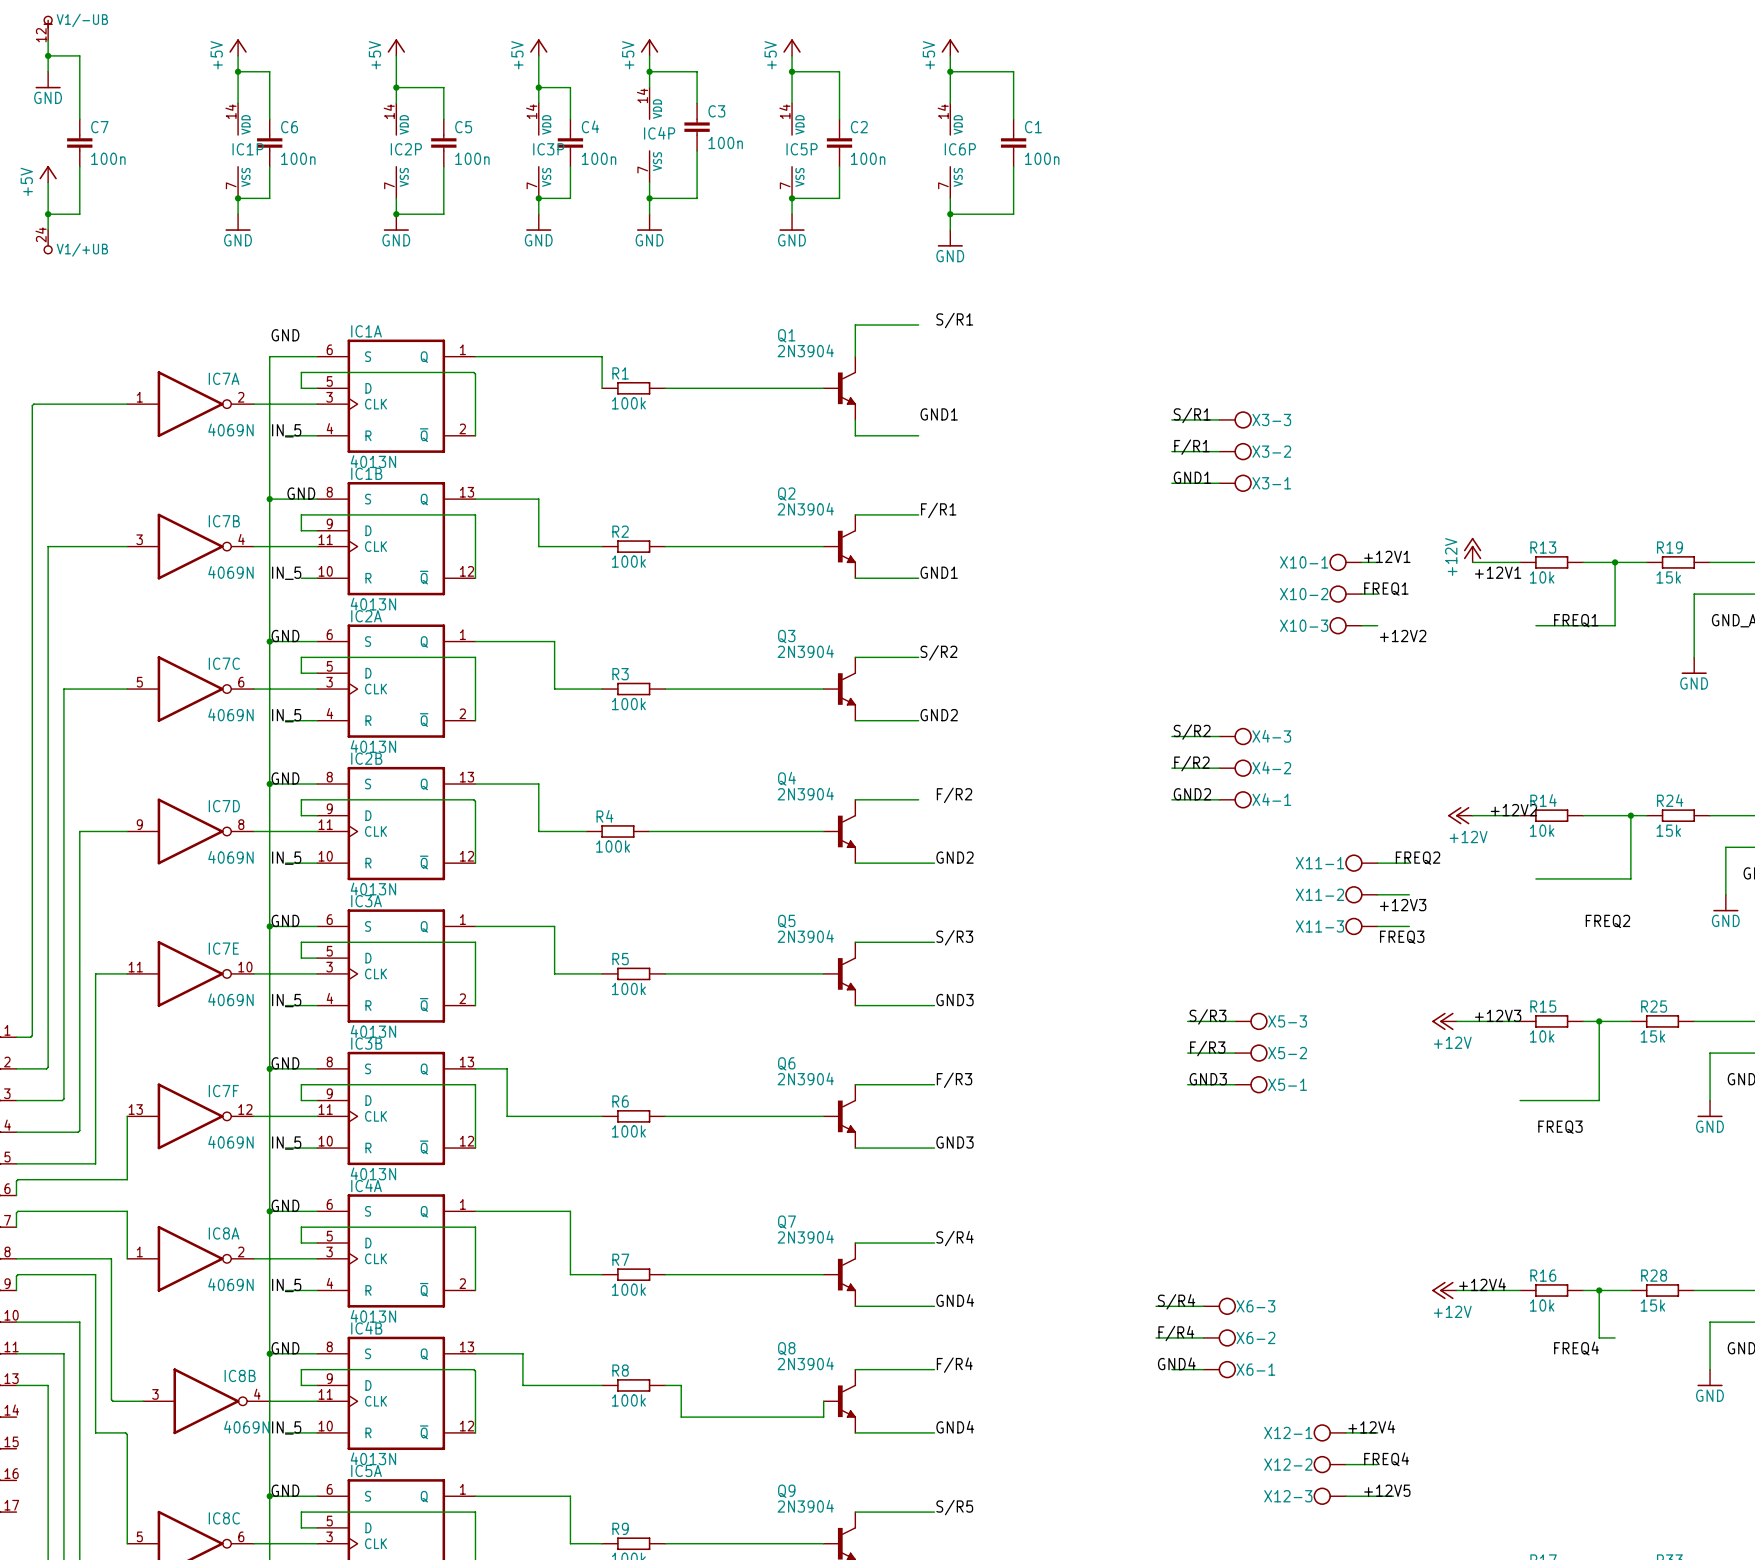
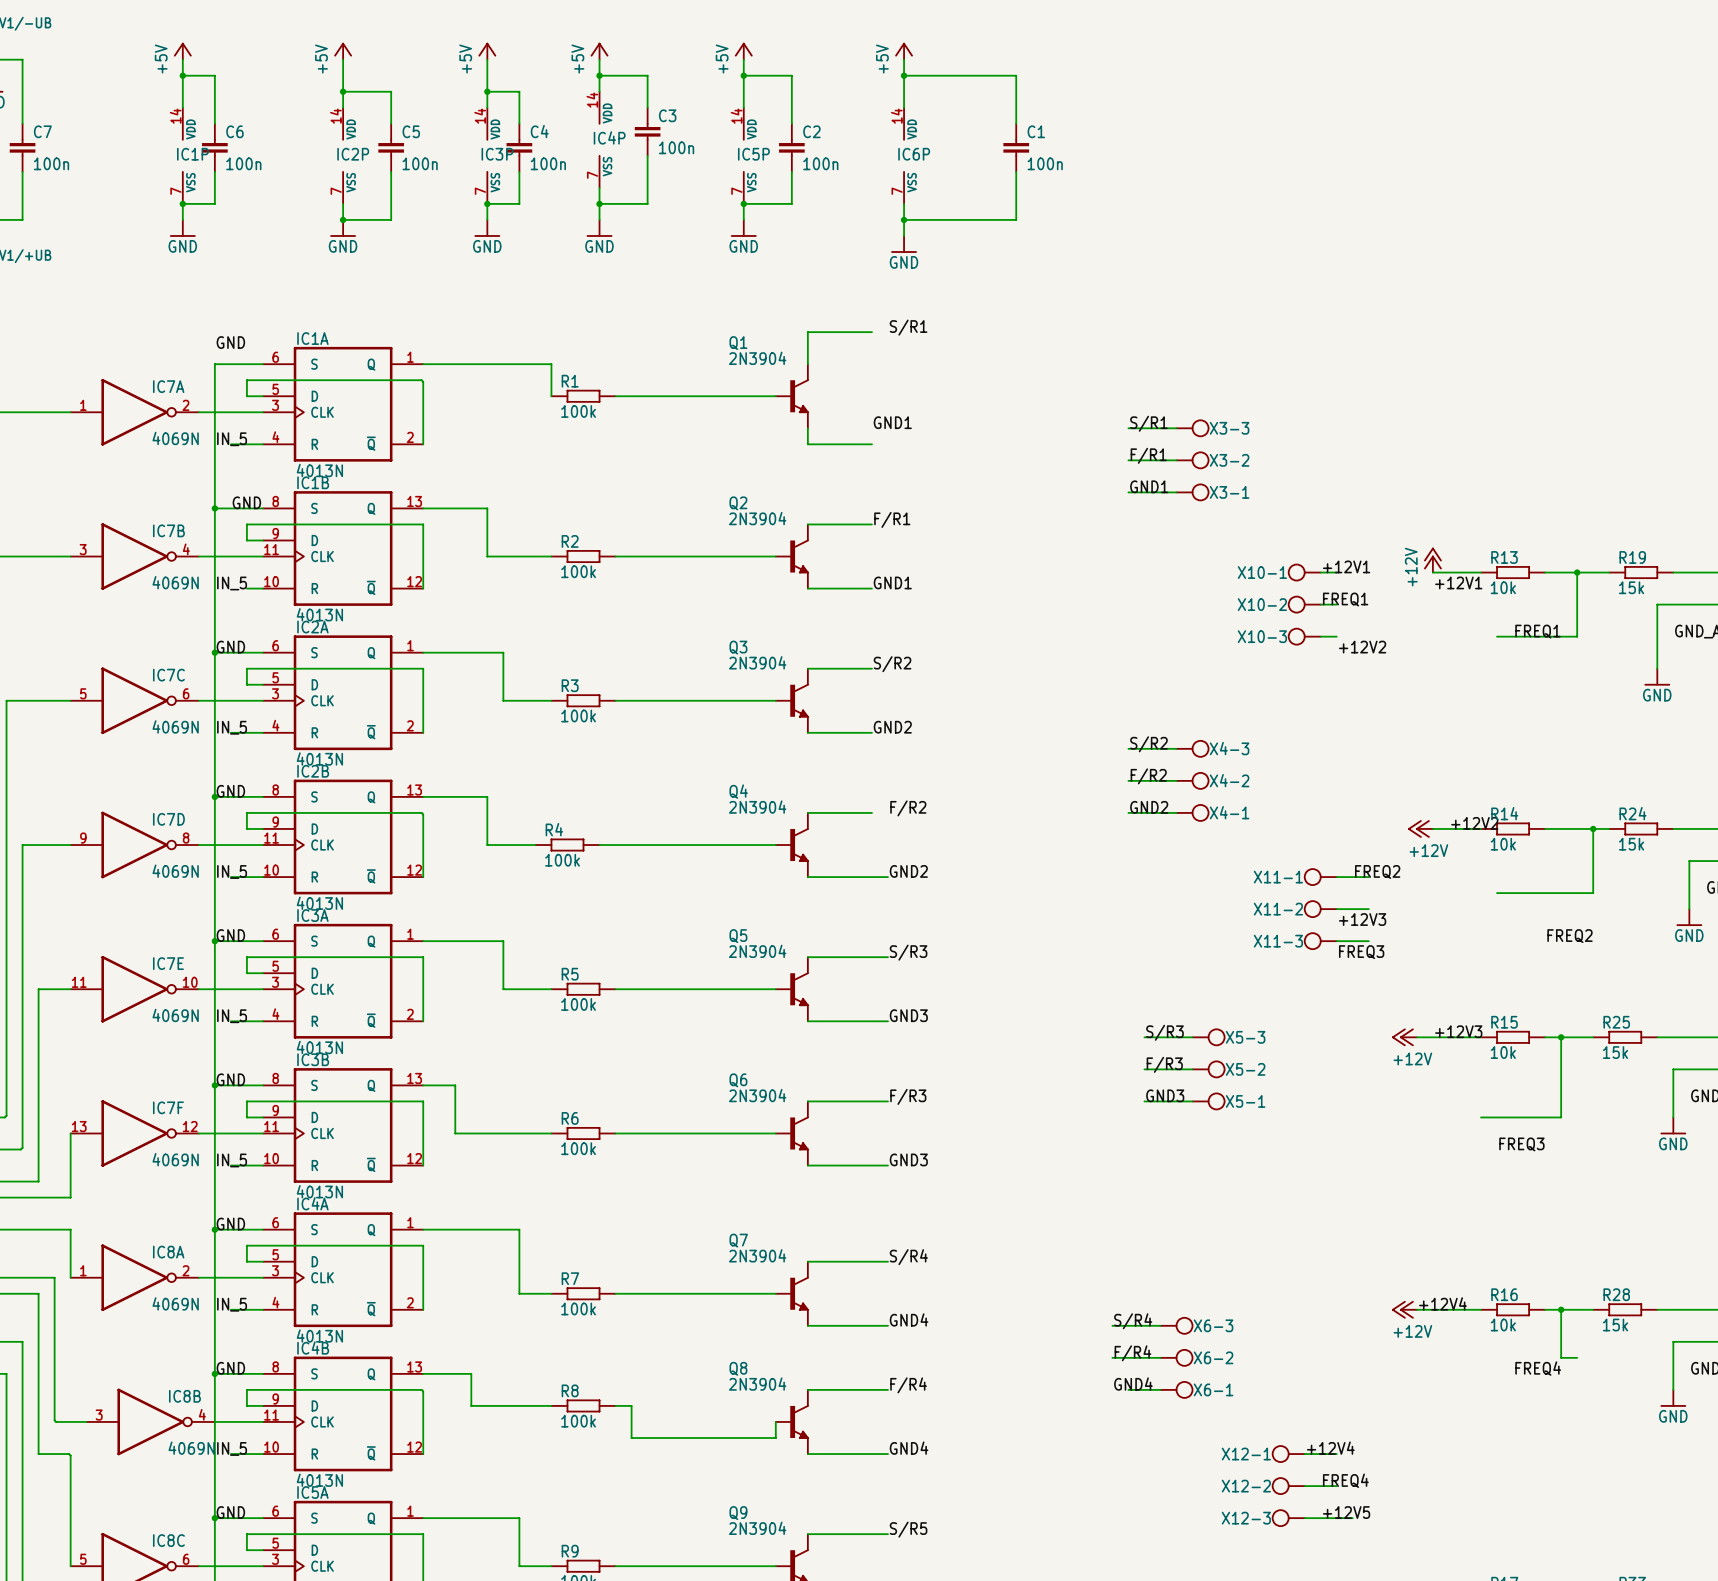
wire: (1013, 71) (1013, 119) -> (968, 75) (1016, 75) (1016, 123)
C1 position: (1013, 142) -> (1016, 147)
wire: (1013, 166) (1013, 214) -> (1016, 171) (1016, 219) (968, 219)

